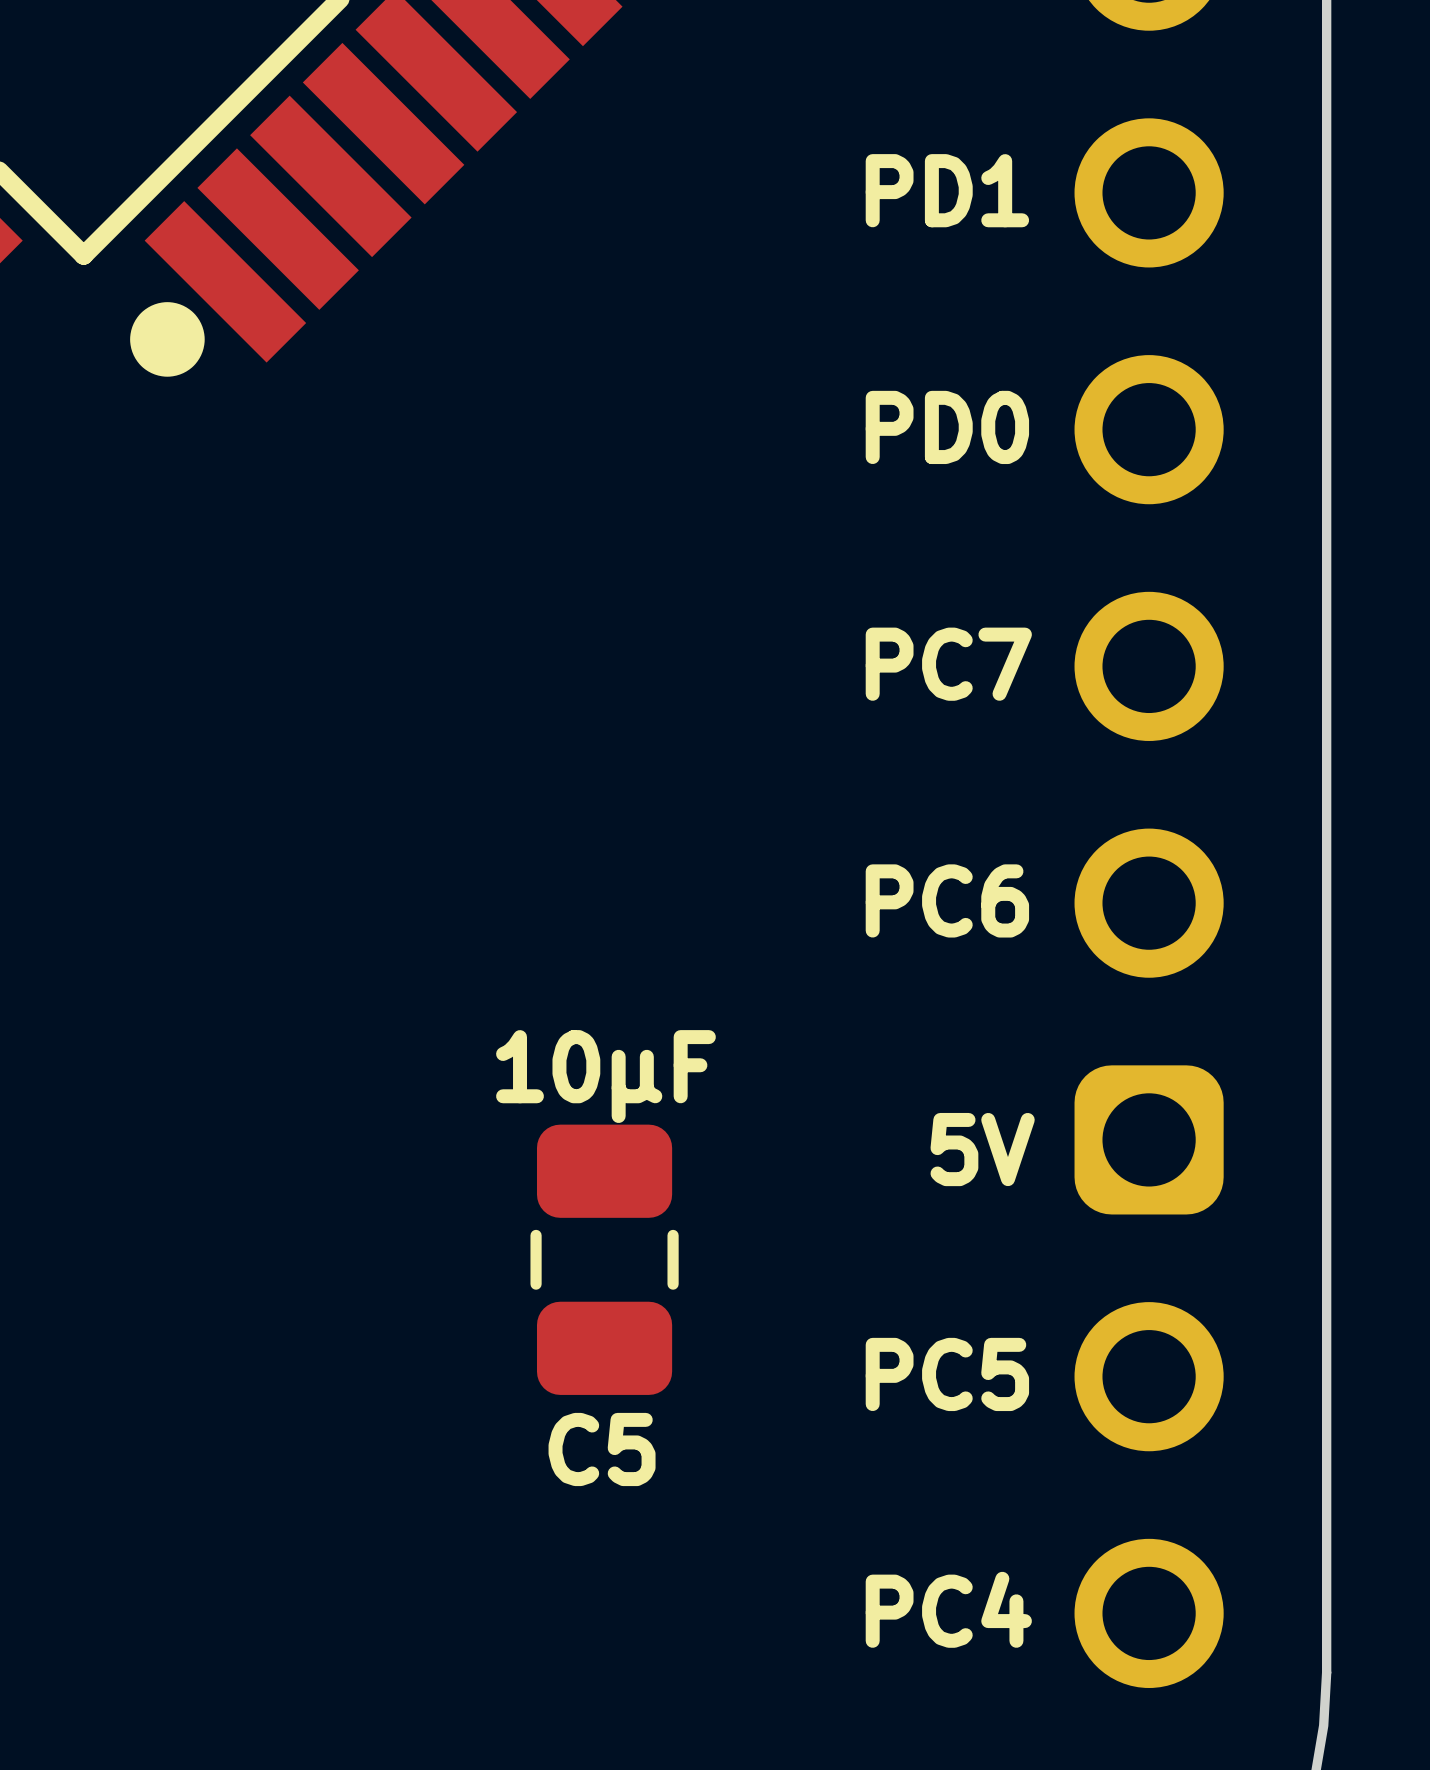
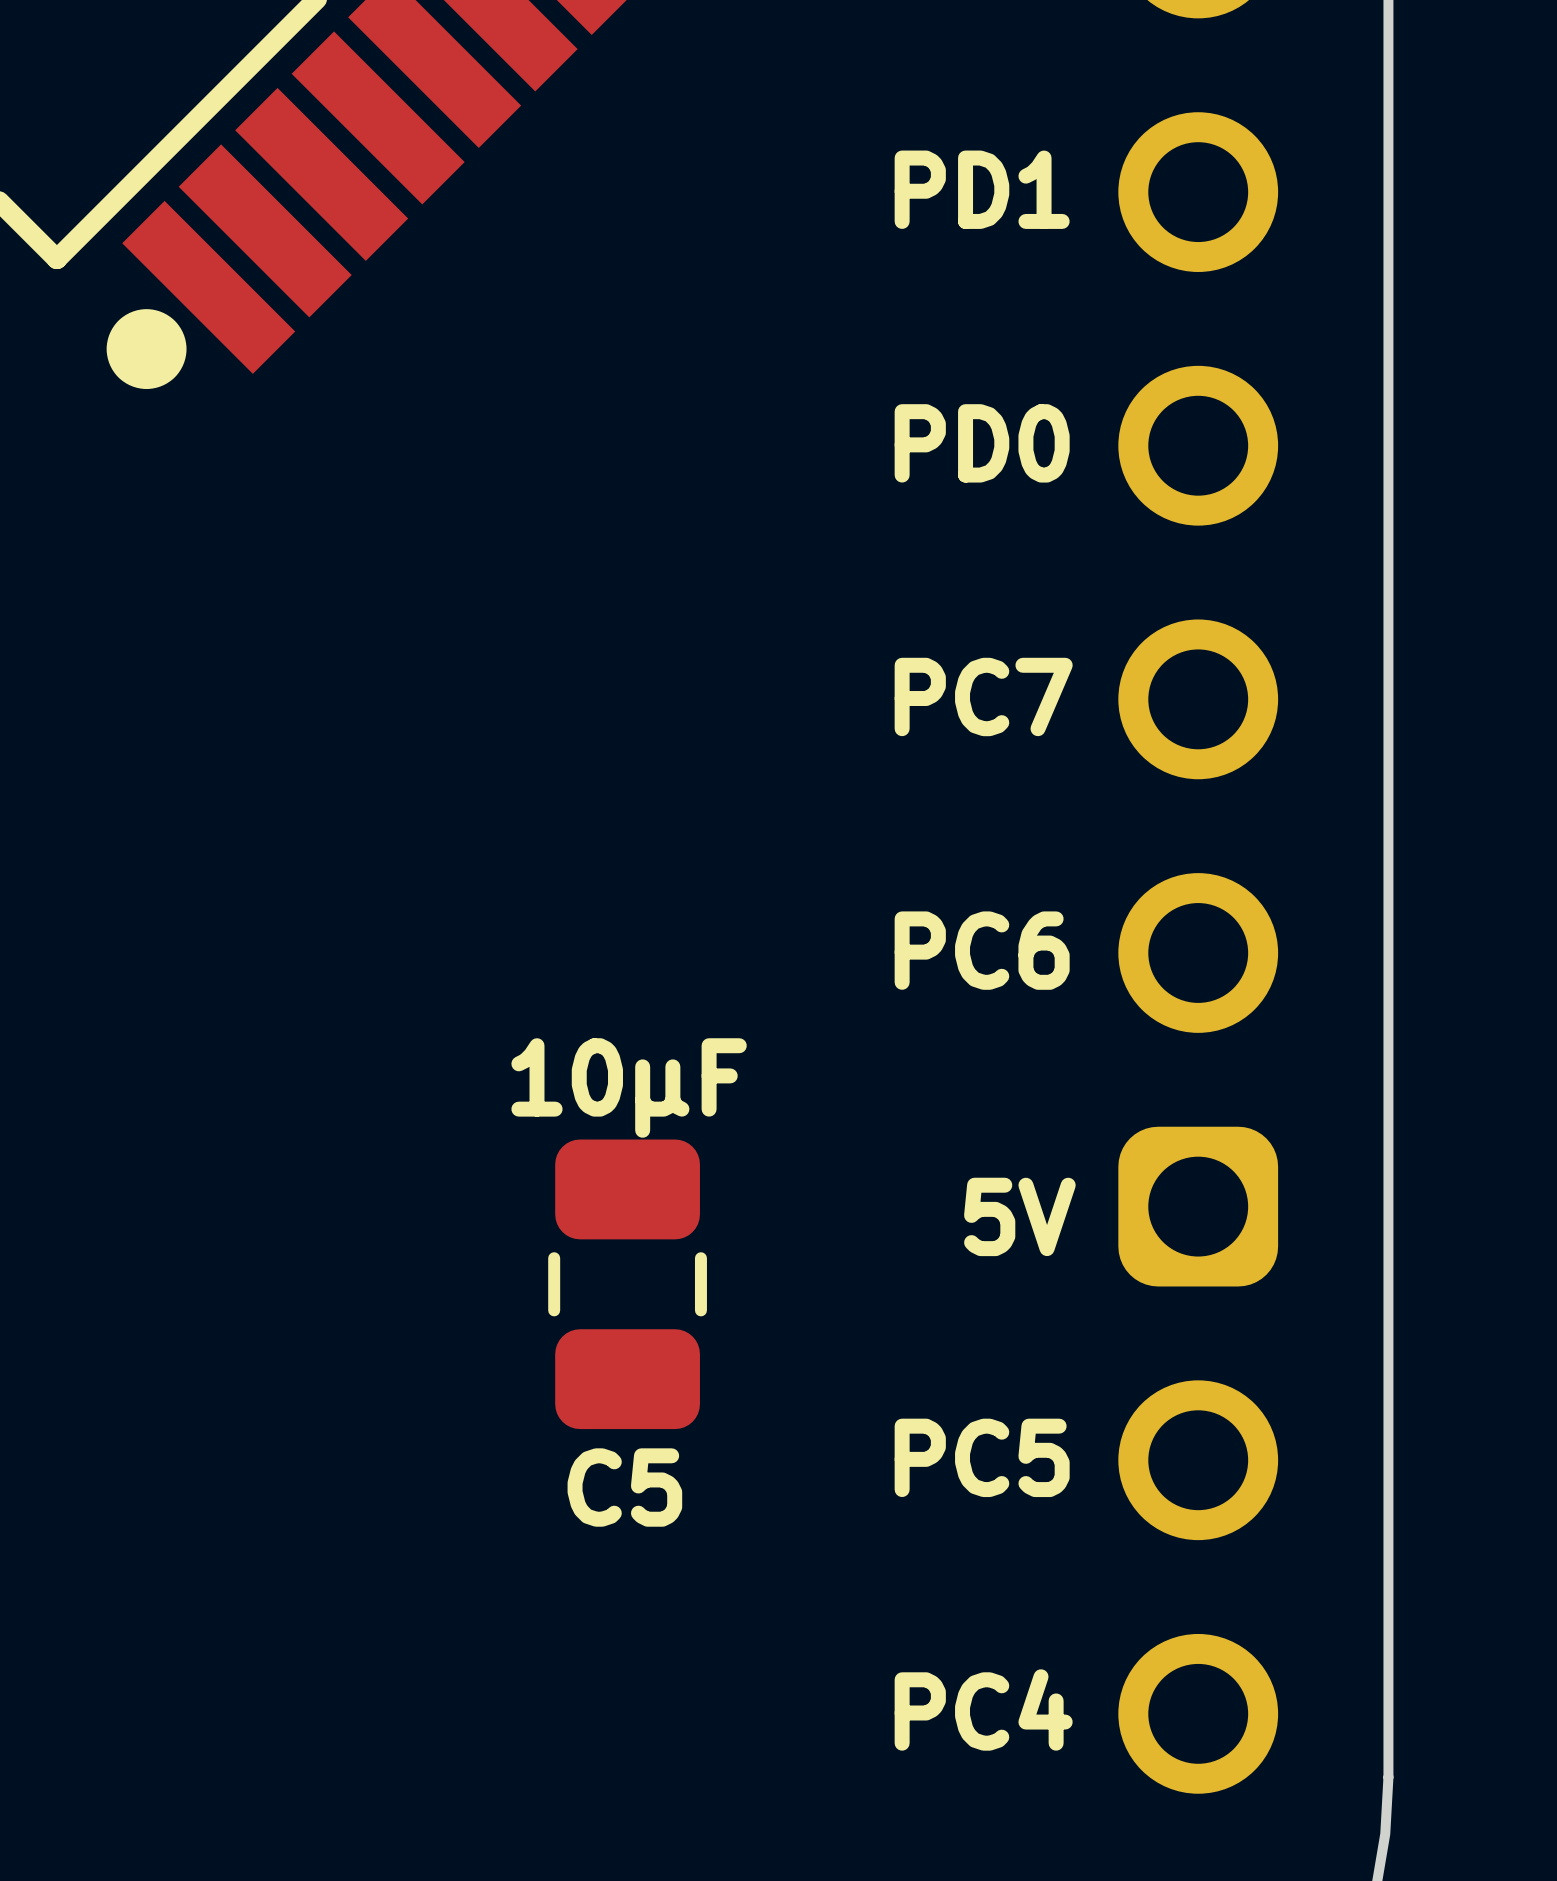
C5 position: (604, 1259) -> (627, 1284)

